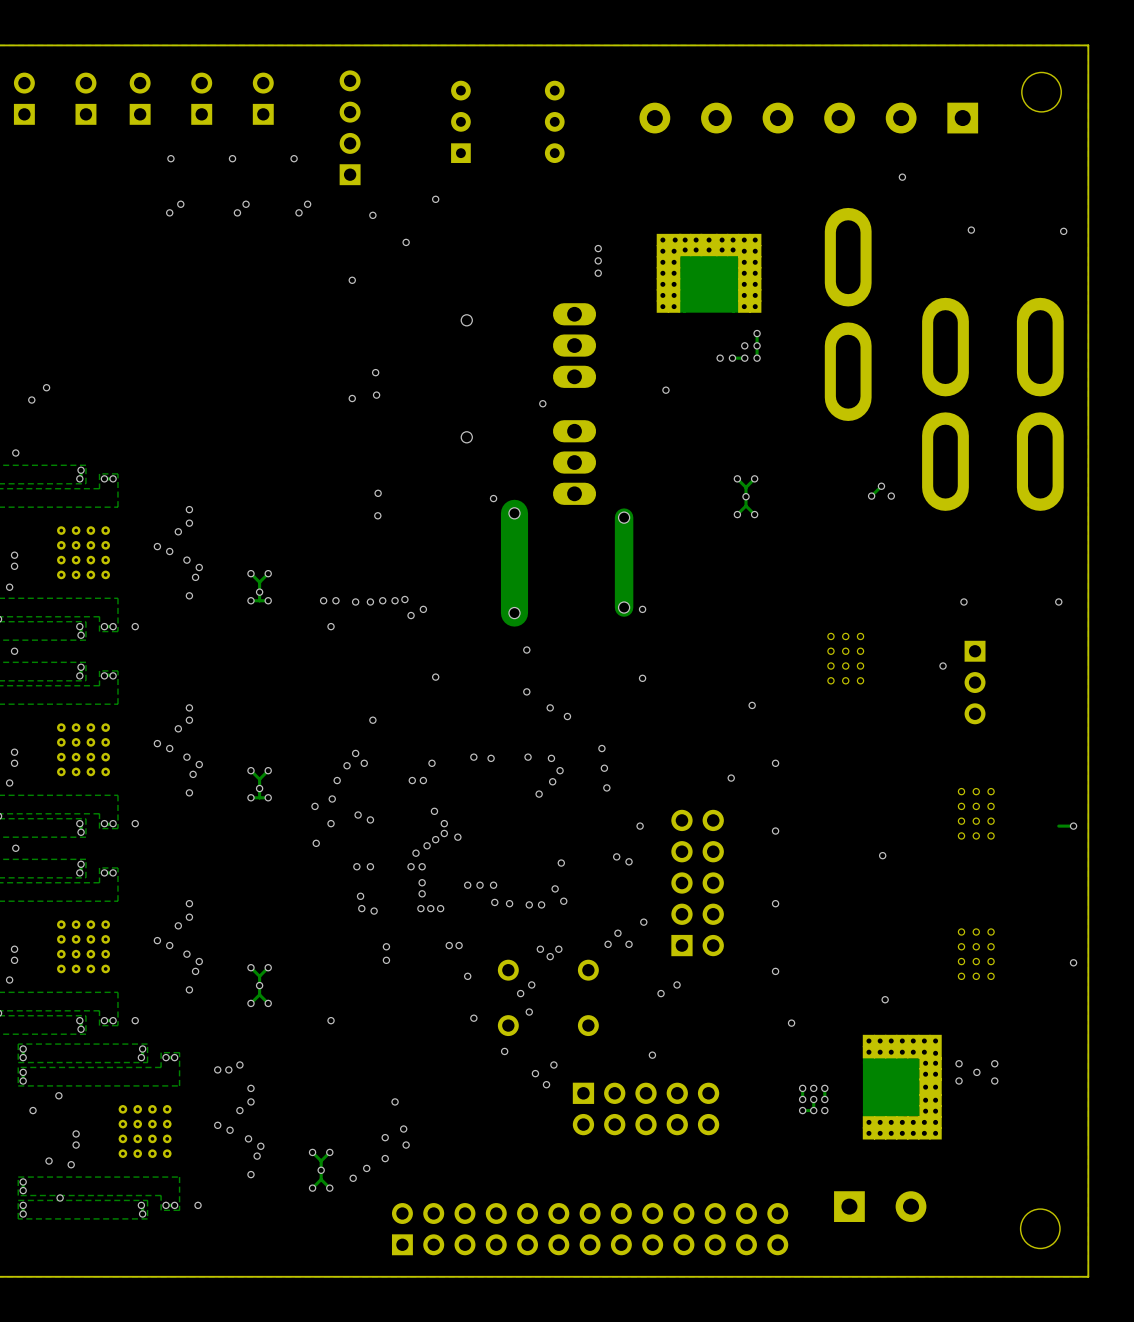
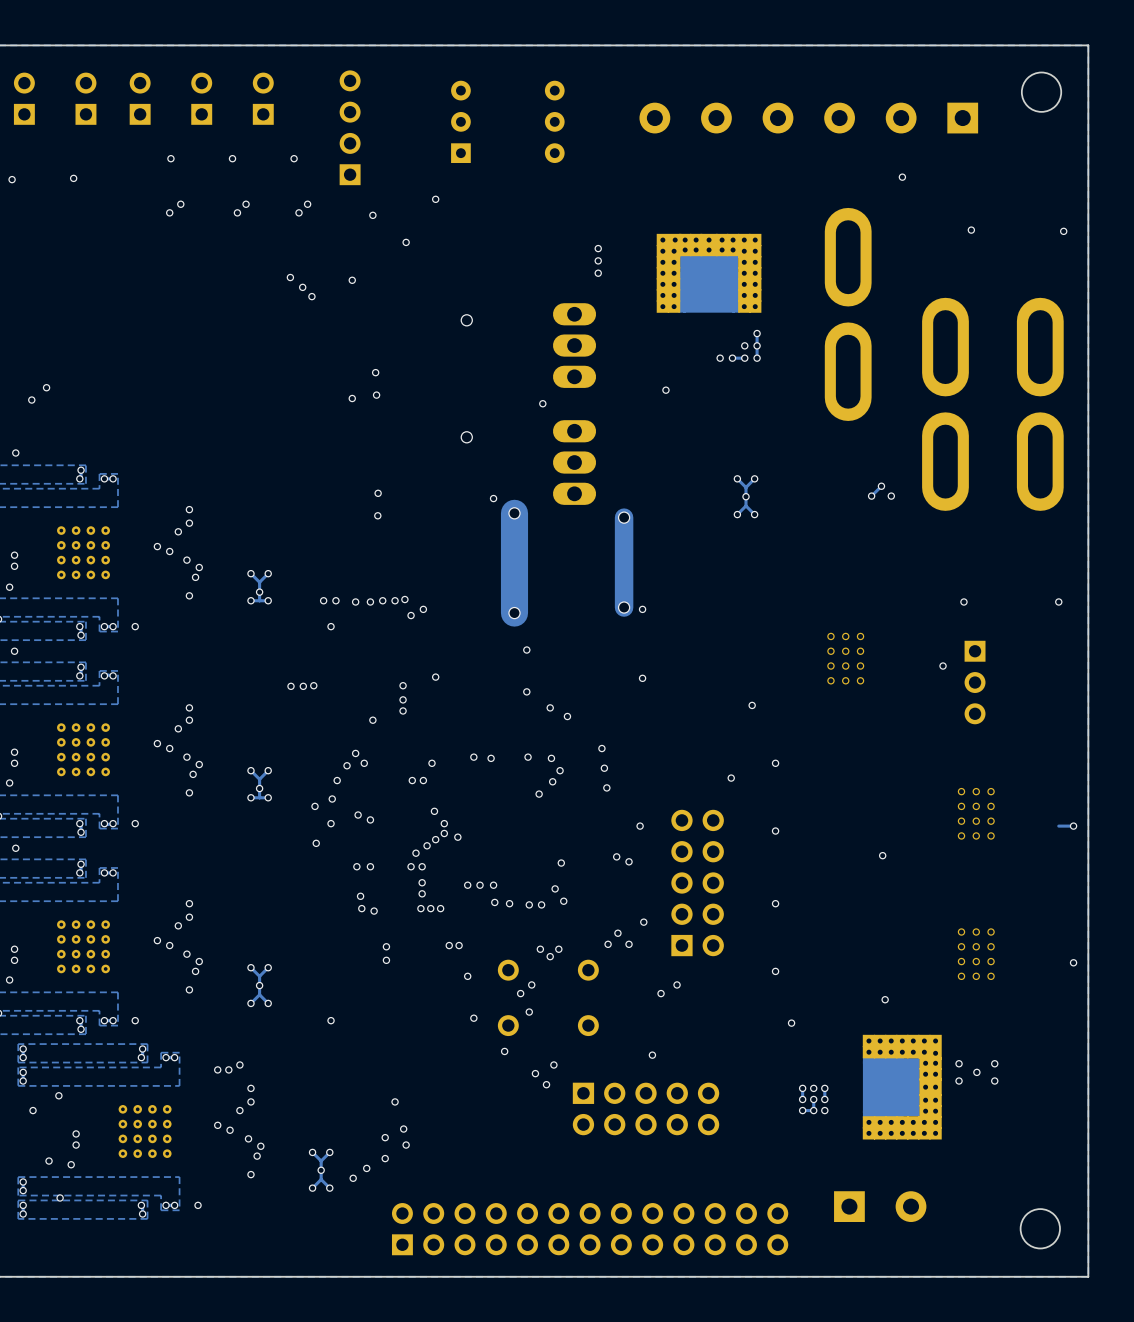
via: none -> (73, 178)
via: none -> (12, 179)
via: none -> (290, 277)
via: none -> (302, 287)
via: none -> (311, 296)
via: none -> (313, 685)
via: none -> (403, 685)
via: none -> (291, 686)
via: none -> (303, 686)
via: none -> (403, 699)
via: none -> (403, 710)

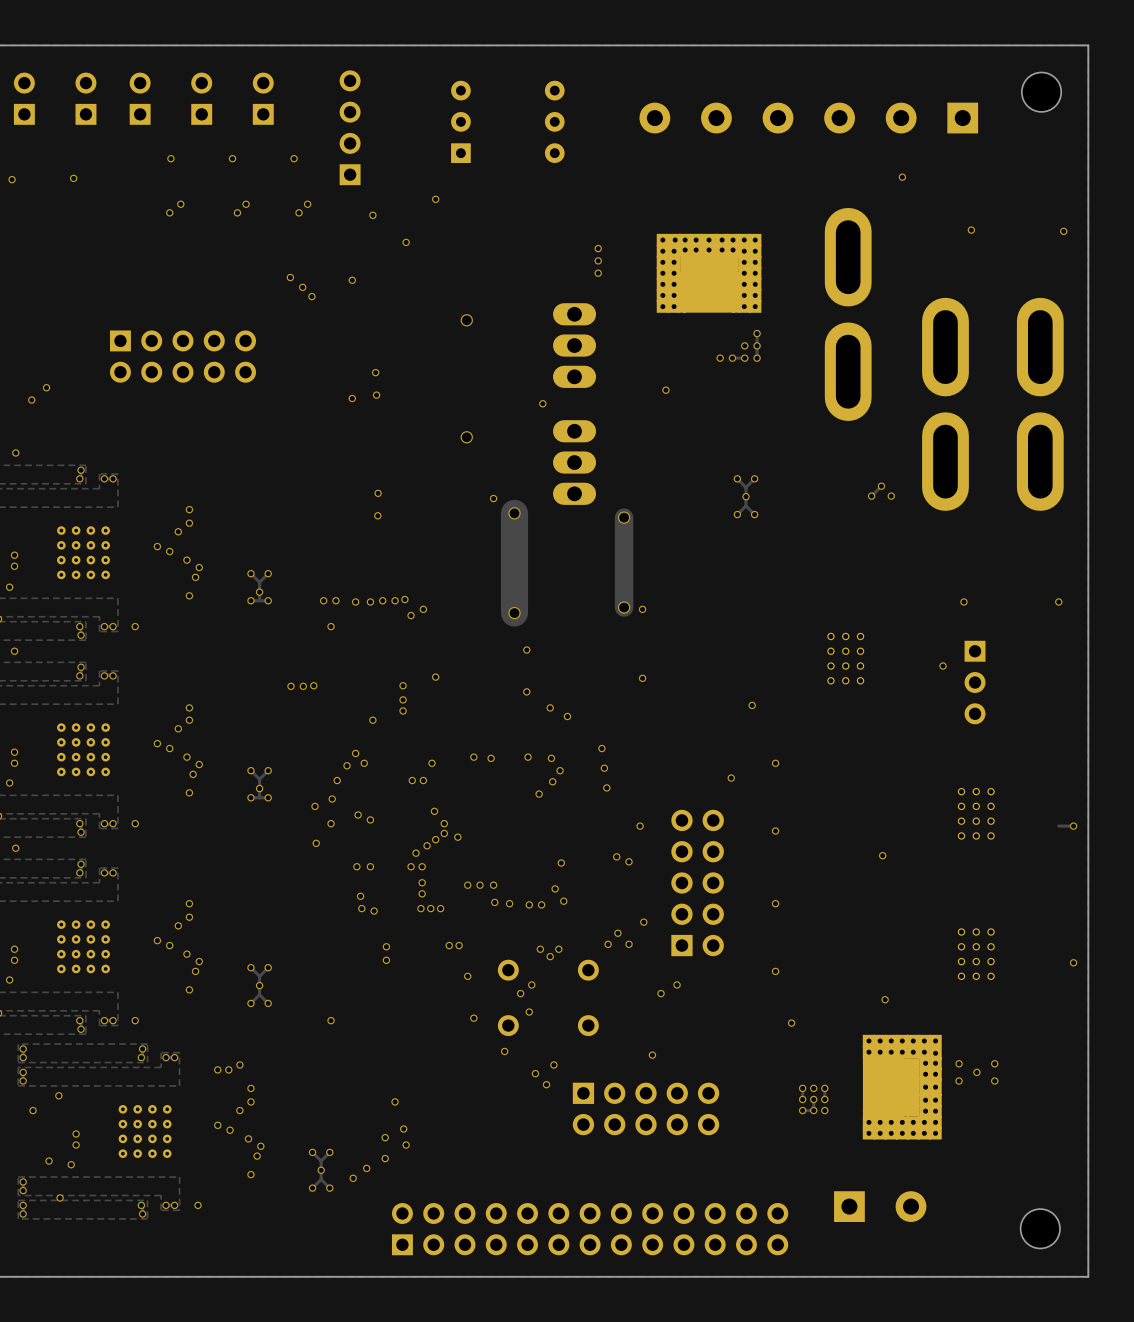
part: none -> (183, 356)

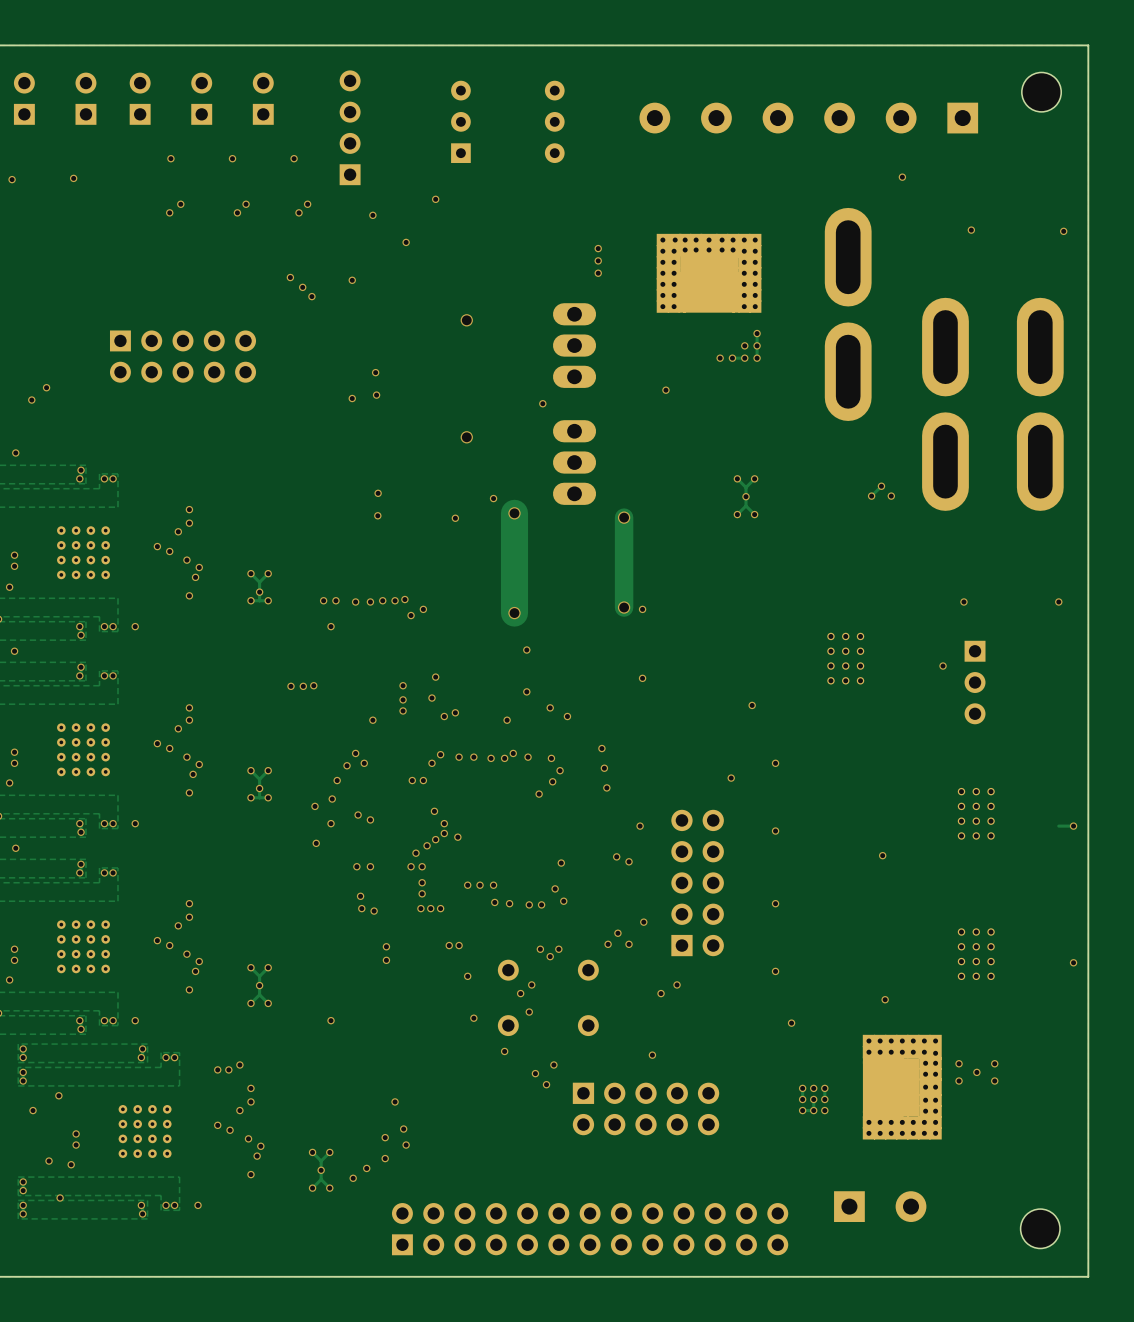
via: none -> (455, 518)
via: none -> (431, 698)
via: none -> (455, 712)
via: none -> (444, 716)
via: none -> (507, 720)
via: none -> (513, 753)
via: none -> (440, 754)
via: none -> (459, 757)
via: none -> (504, 758)

